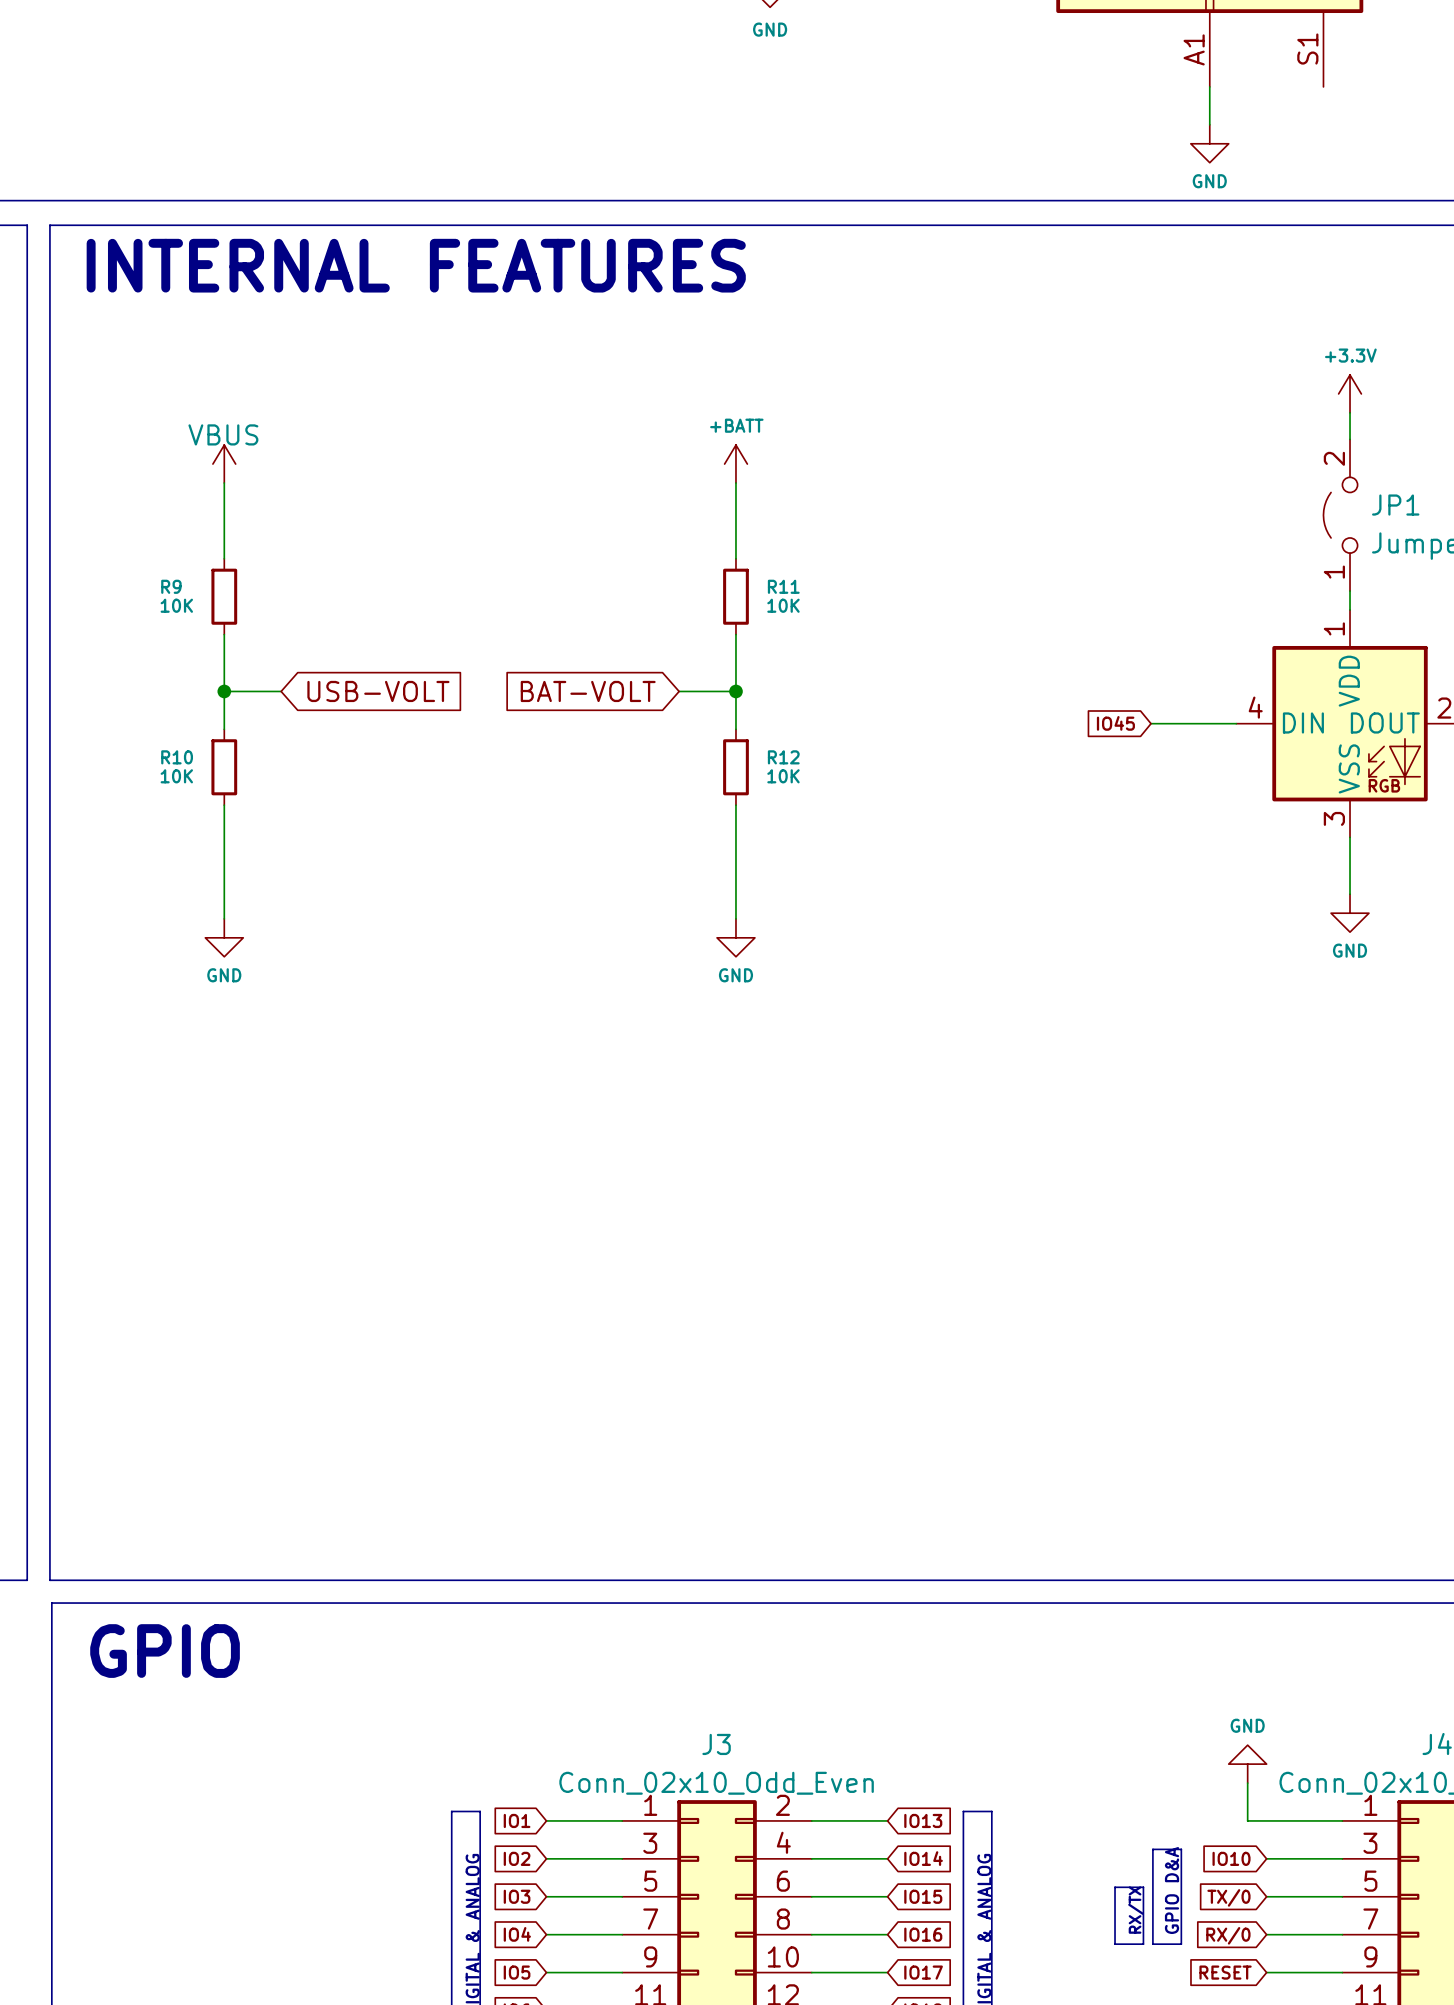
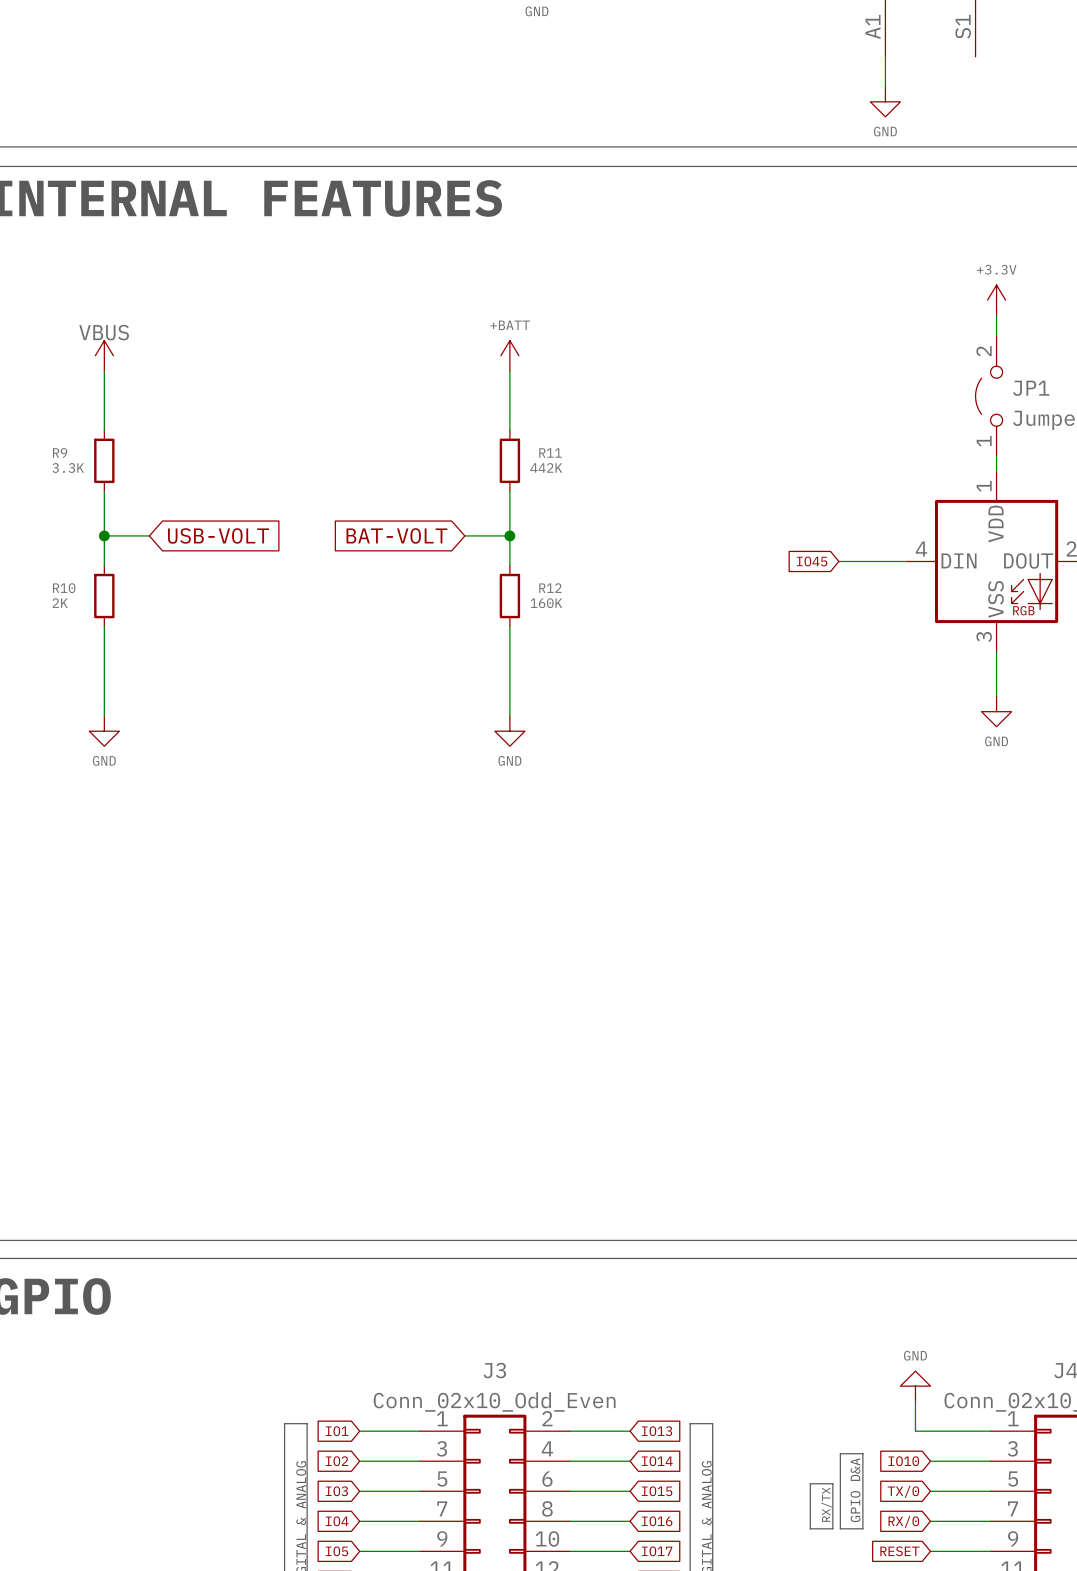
R9 value: 10K (176, 605) -> 3.3K (68, 468)
R11 value: 10K (783, 605) -> 442K (546, 467)
R10 value: 10K (176, 776) -> 2K (60, 603)
R12 value: 10K (783, 776) -> 160K (546, 603)

